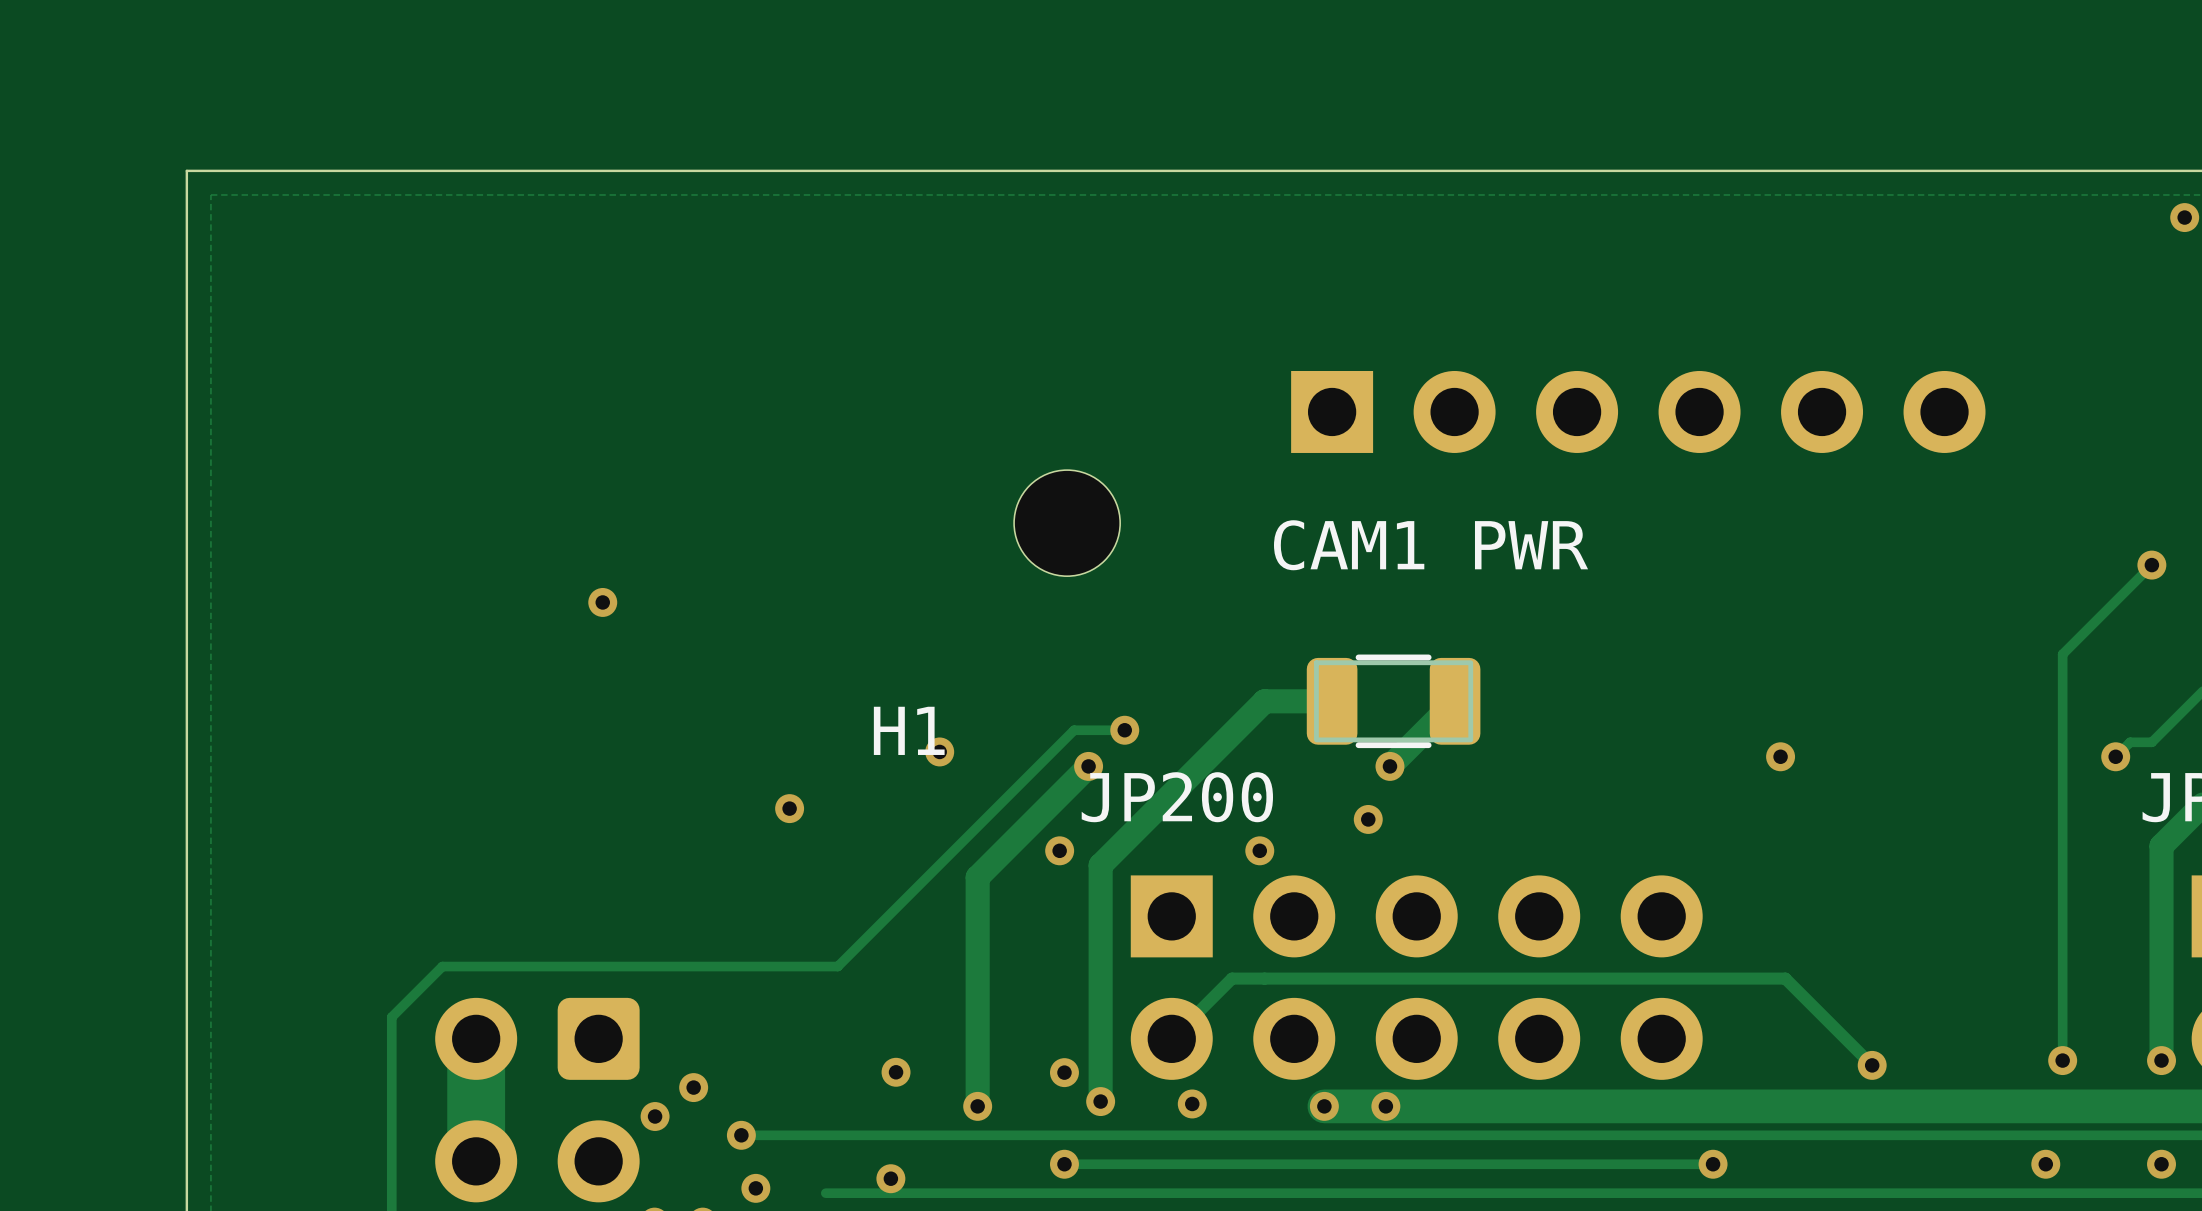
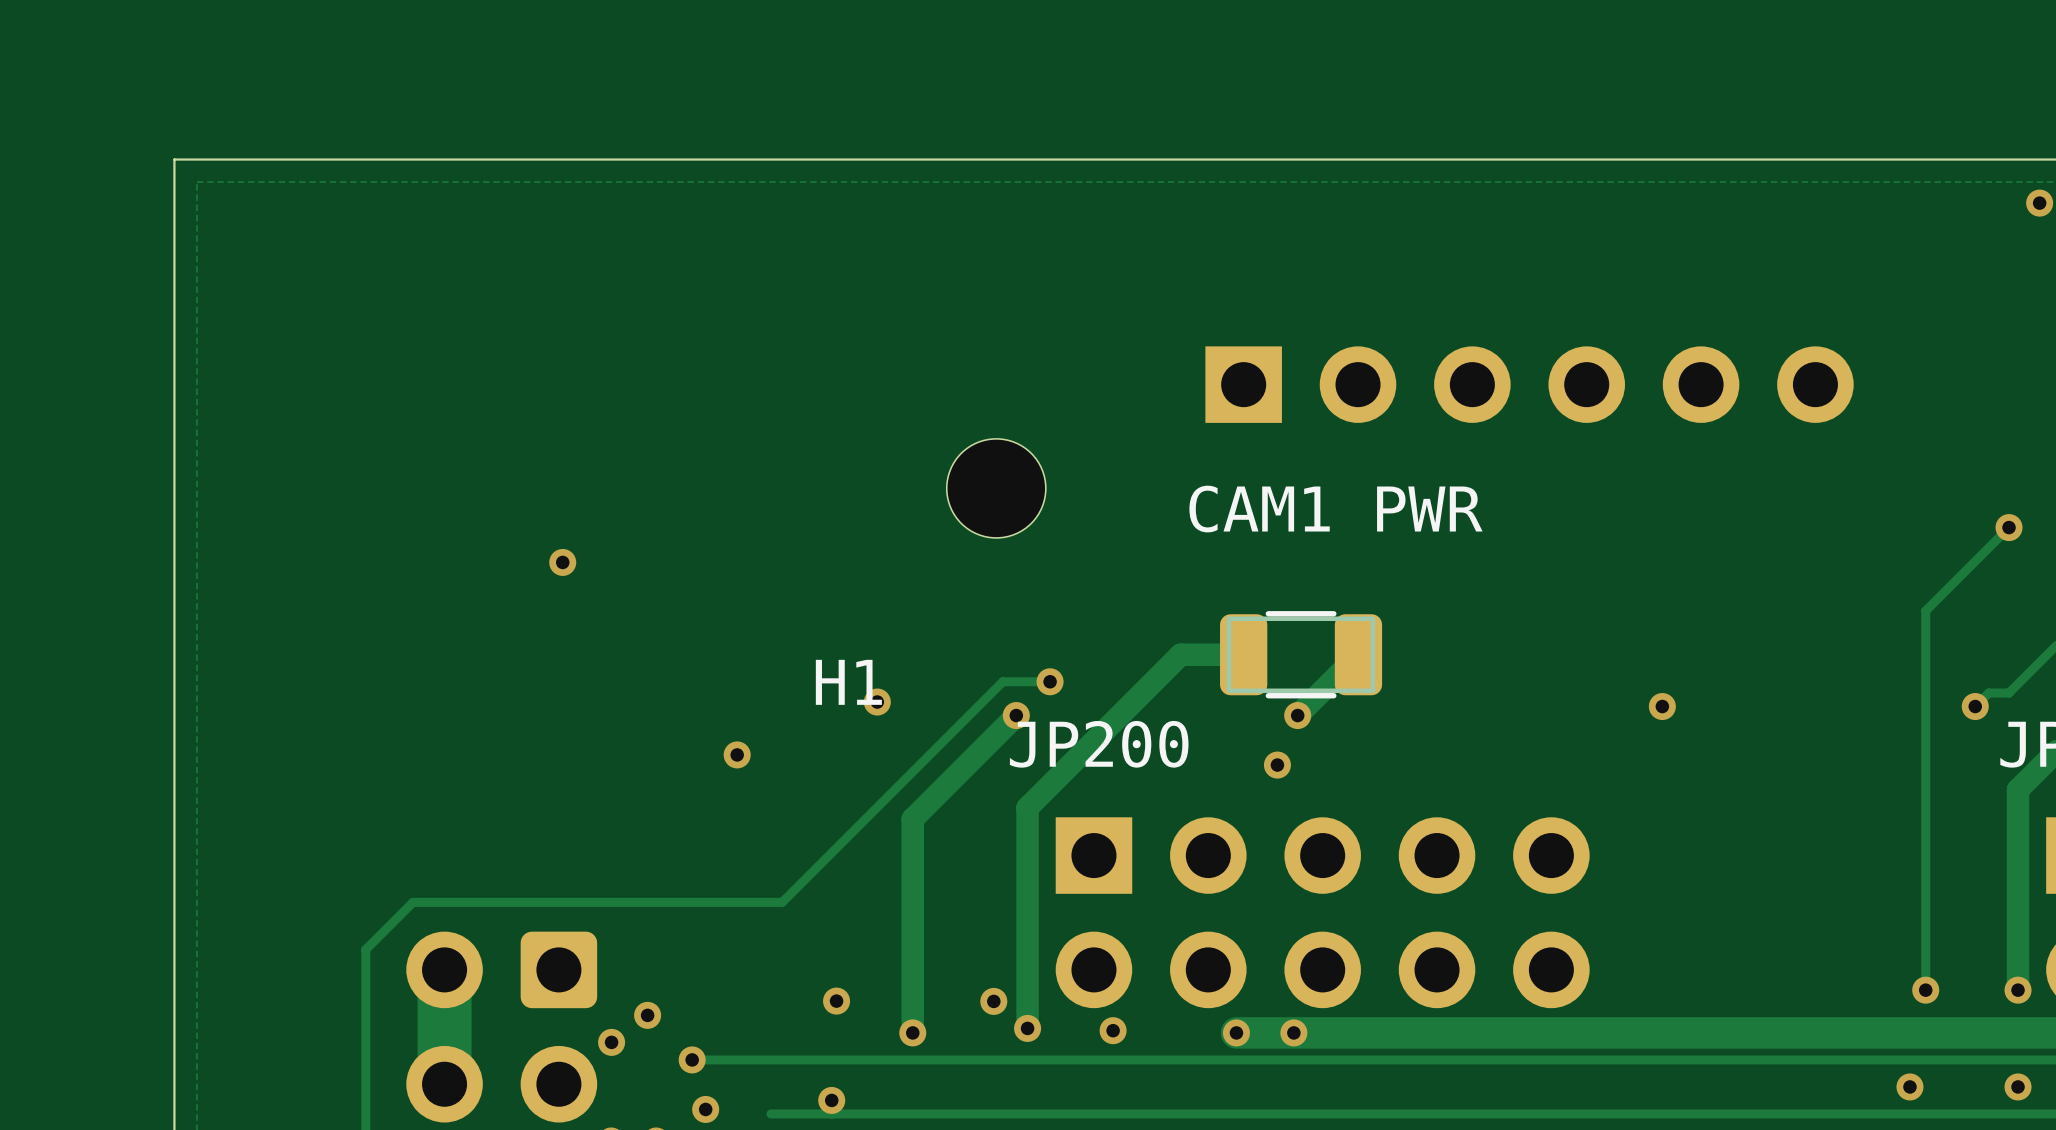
via: (1059, 850) -> none
via: (1259, 850) -> none
track: (1171, 1038) (1232, 978) (1785, 978) (1872, 1065) -> none
via: (1872, 1065) -> none
track: (1064, 1164) (1713, 1164) -> none
via: (1064, 1164) -> none
via: (1713, 1164) -> none

